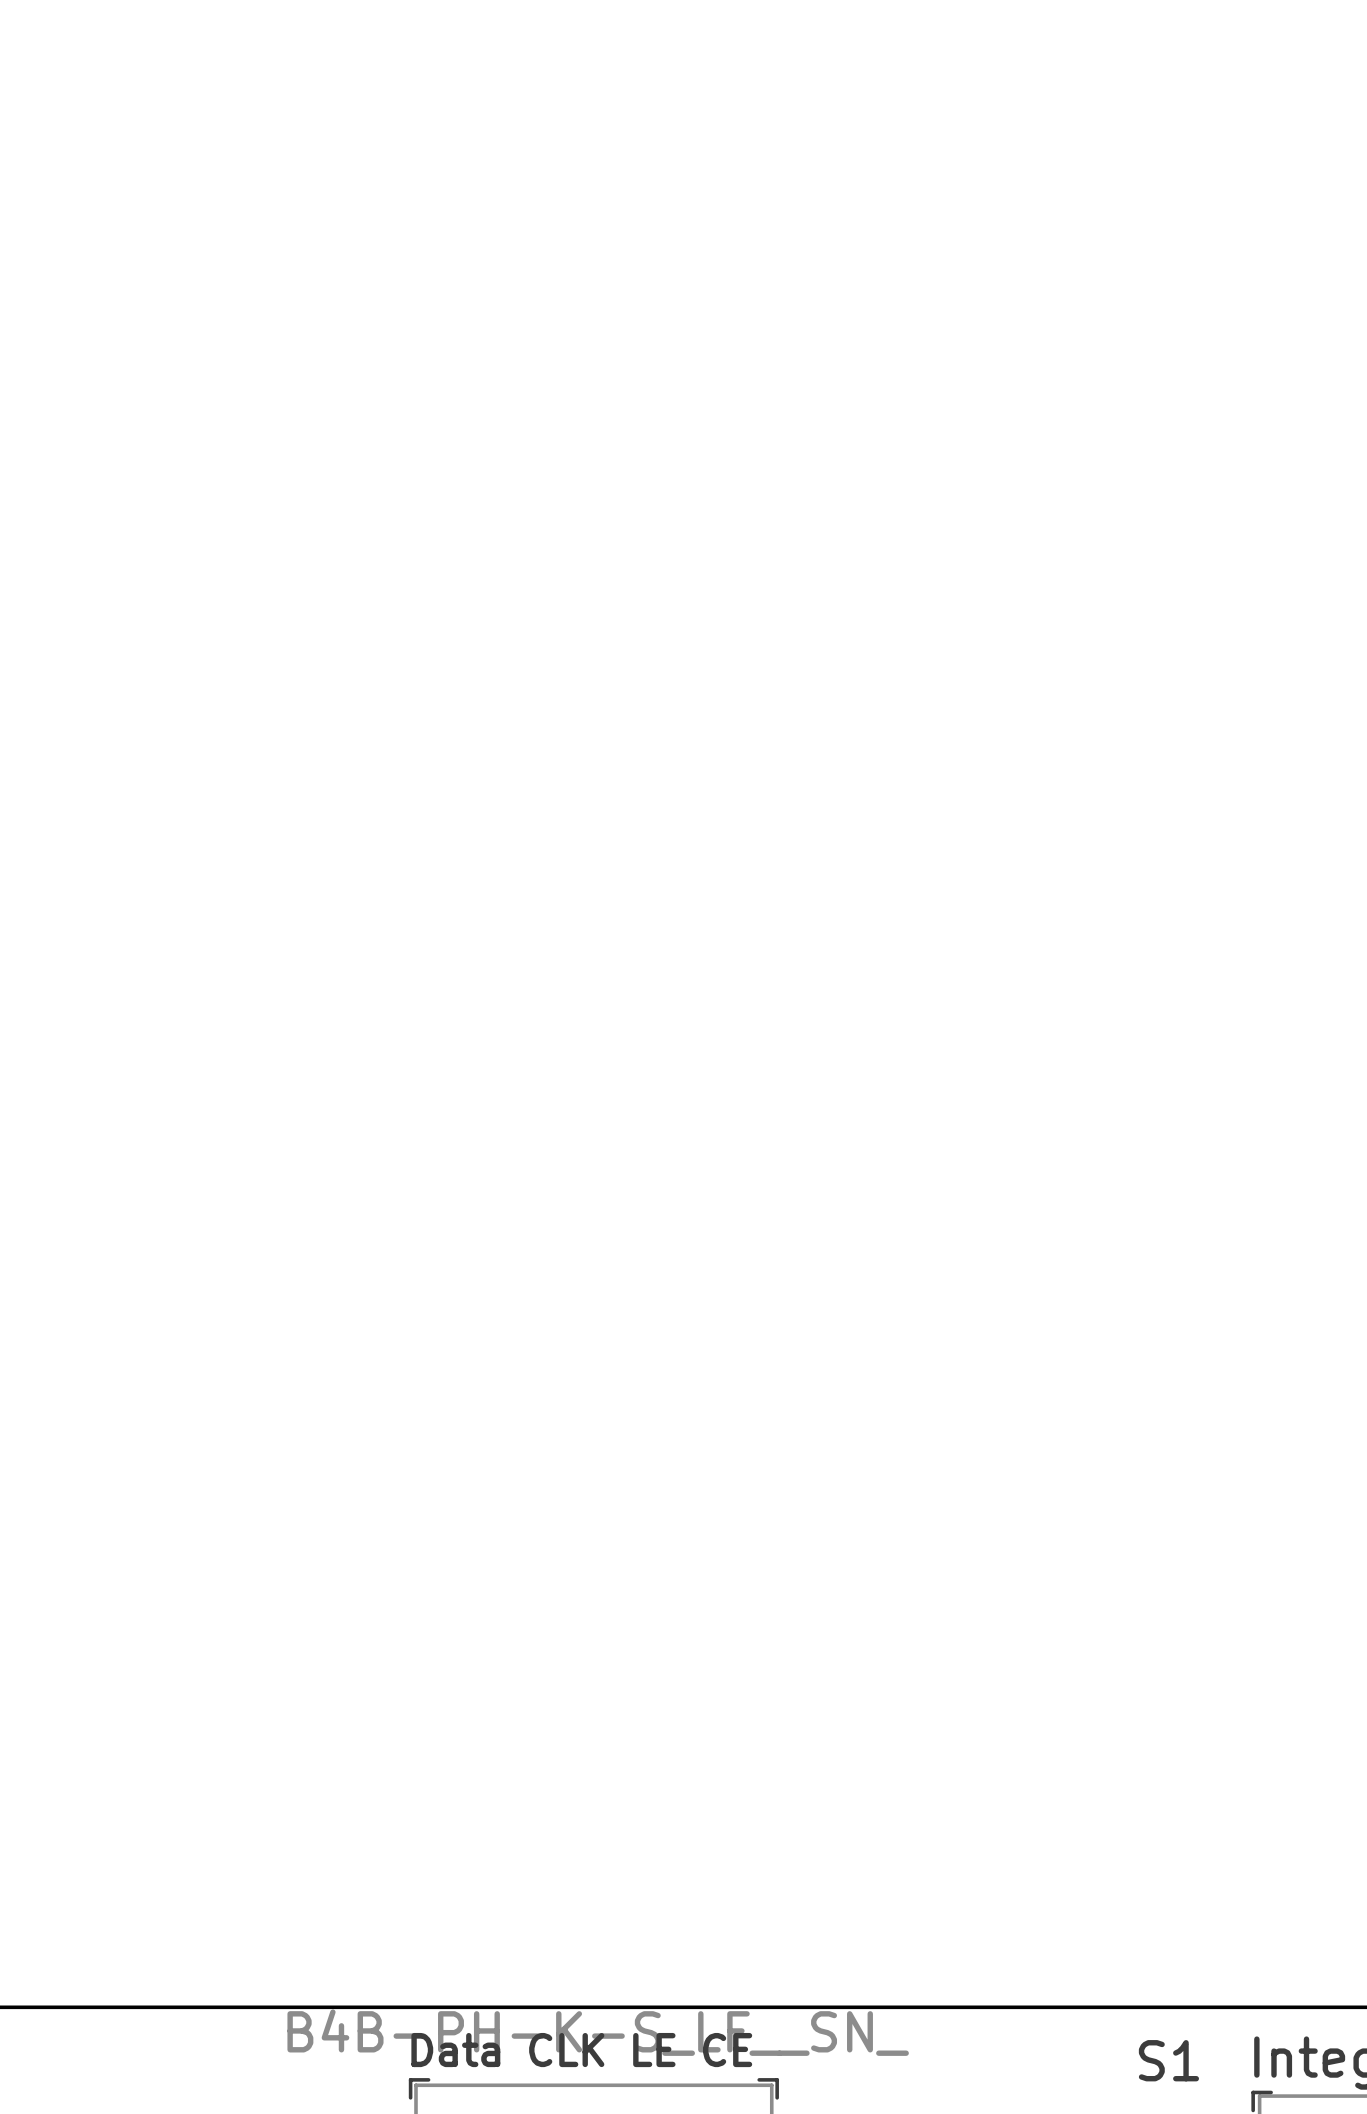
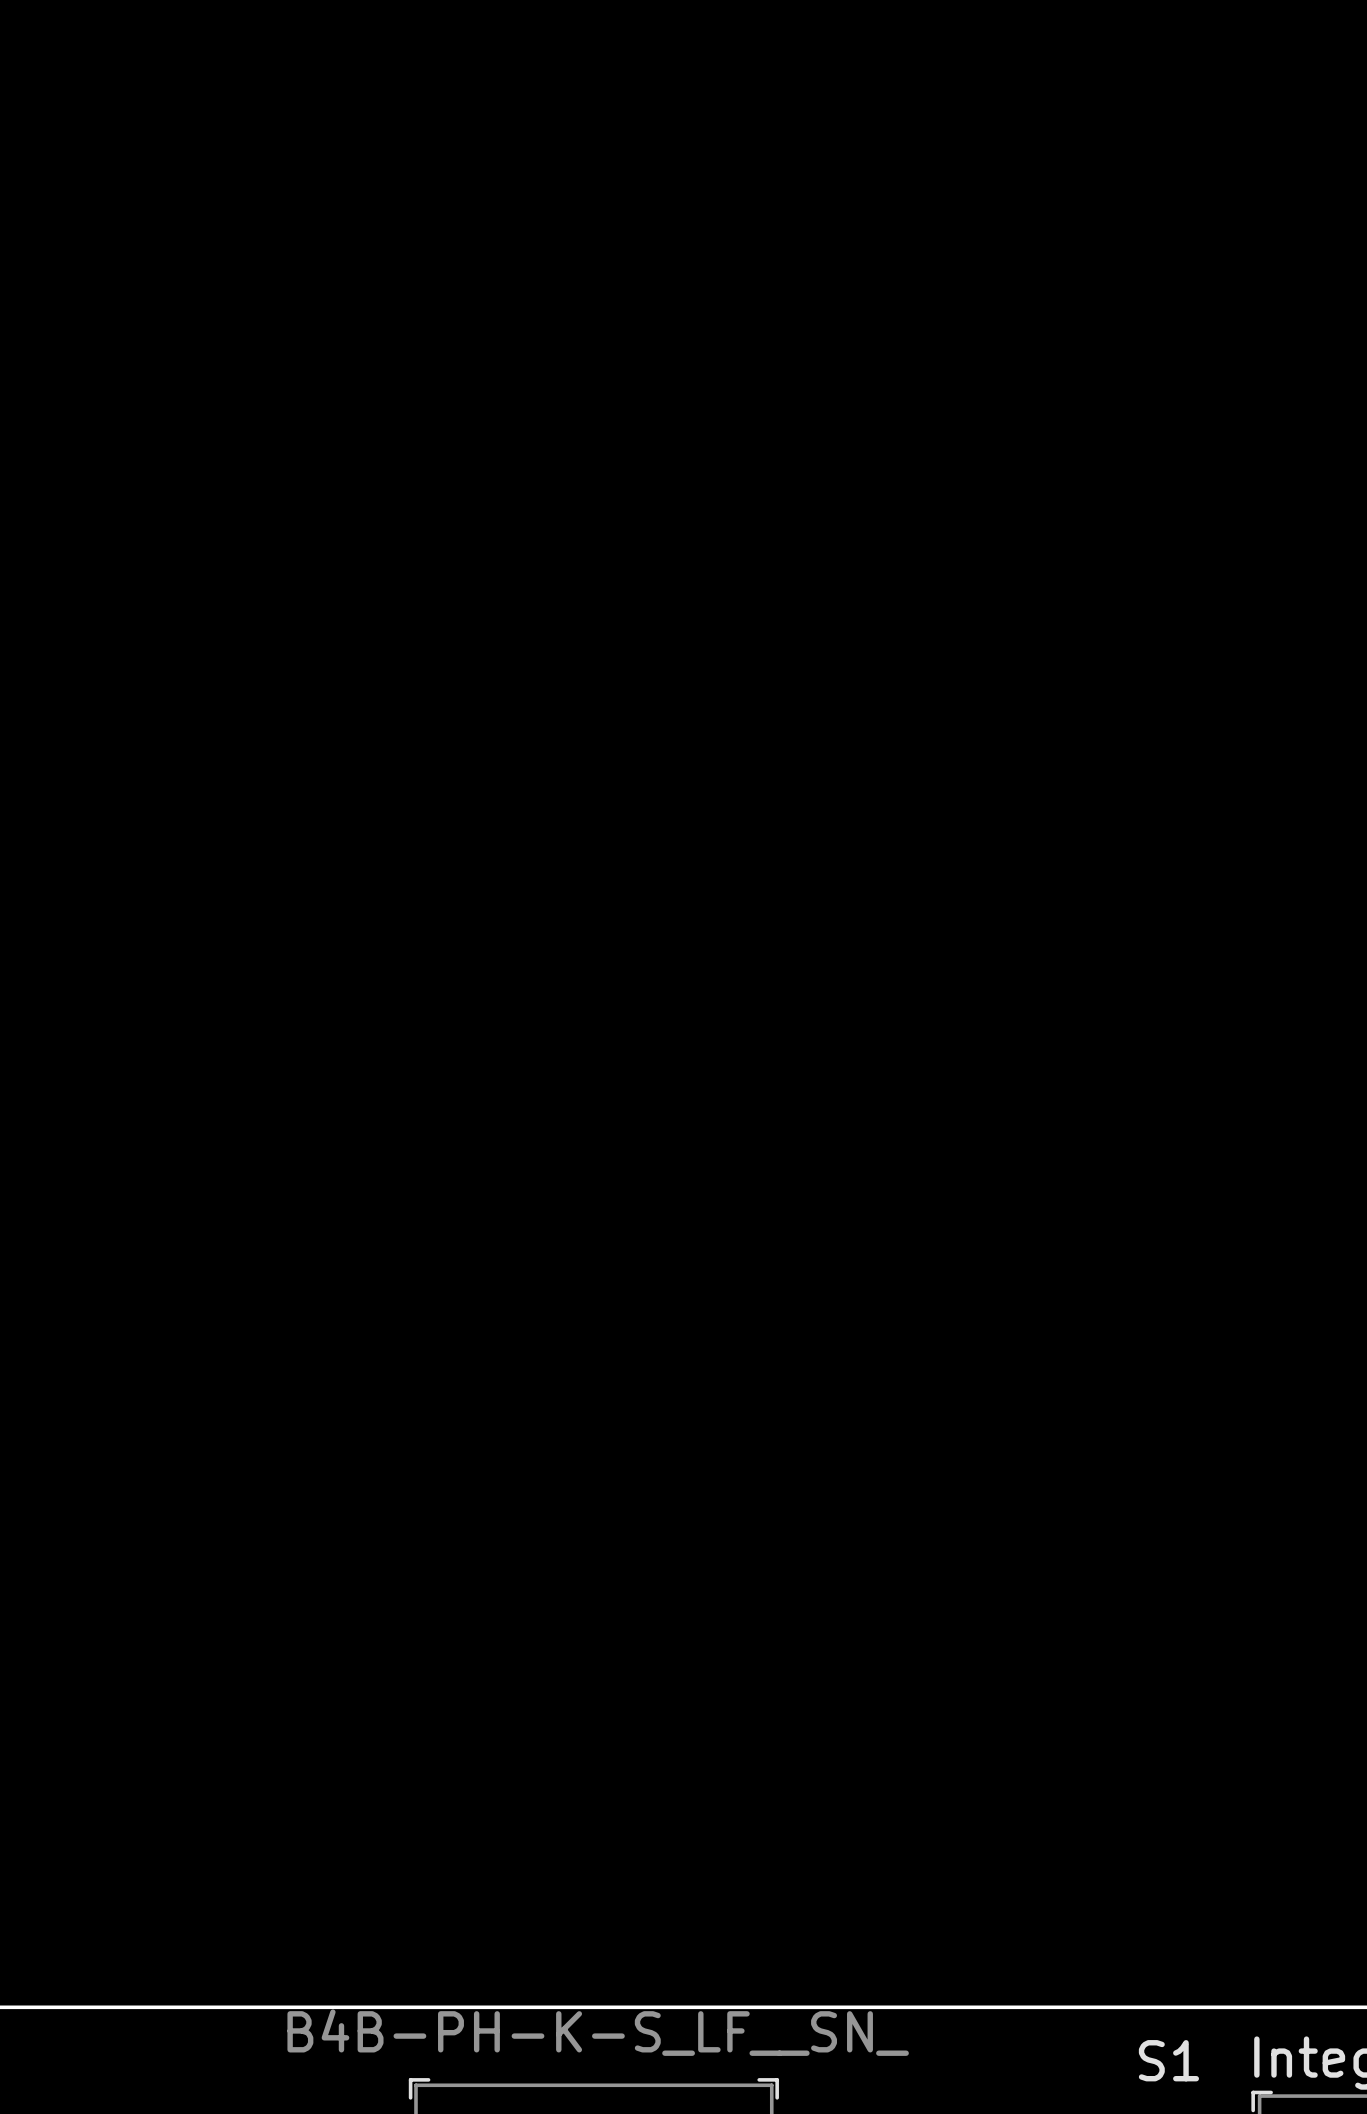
text: Data CLK LE CE (581, 2050) -> none

